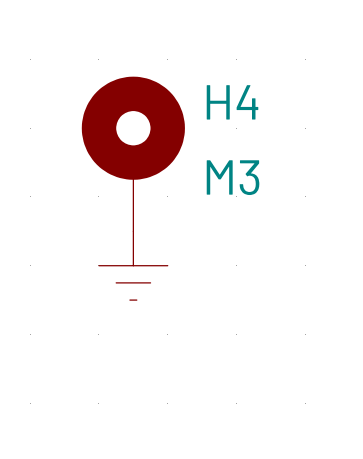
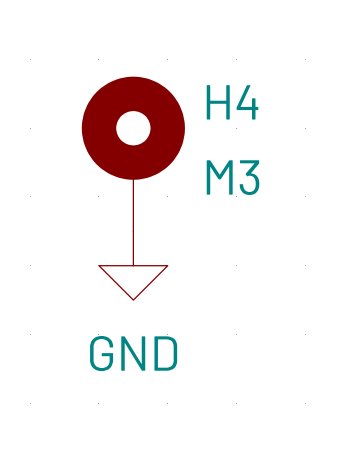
power symbol shape: [98, 231, 168, 301] -> [98, 231, 168, 301]
power symbol text: none -> GND (133, 353)

